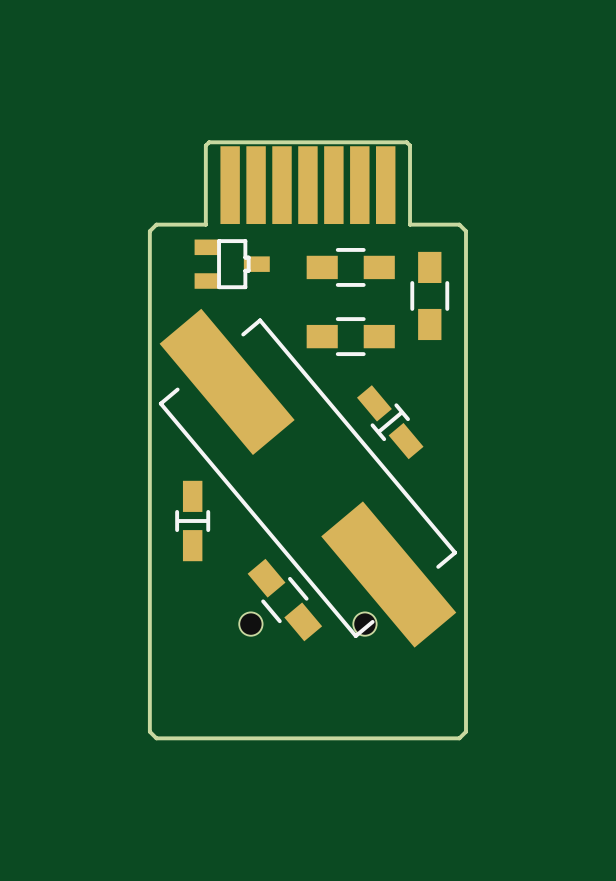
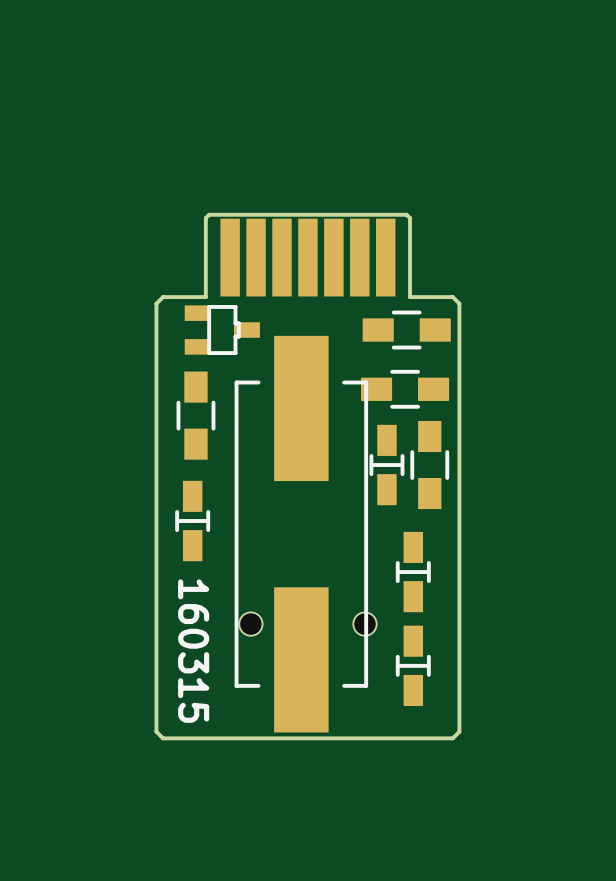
part position: (307, 185) -> (307, 257)
board edge: (410, 218) (410, 145) (406, 142) (209, 142) (205, 145) (205, 218) -> (410, 218) (406, 214) (209, 214) (205, 218)
board edge: (205, 224) (156, 224) (149, 231) (149, 731) (156, 738) (163, 738) -> (205, 224) (205, 297) (163, 297) (156, 303) (156, 731) (163, 738)
board edge: (410, 224) (459, 224) (466, 231) (466, 731) (459, 738) (452, 738) -> (410, 224) (410, 297) (452, 297) (459, 303) (459, 731) (452, 738)
part position: (232, 264) -> (222, 330)
part: (350, 267) -> none
part: (429, 295) -> none
part: none -> (406, 330)
part: (350, 336) -> none
part: none -> (405, 389)
part: none -> (195, 415)
part: (390, 422) -> none
part: none -> (386, 465)
part: none -> (429, 465)
part: (307, 478) -> none
part: none -> (301, 534)
part: none -> (413, 572)
part: (284, 600) -> none
text: none -> 160315 (193, 651)
part: none -> (413, 665)

